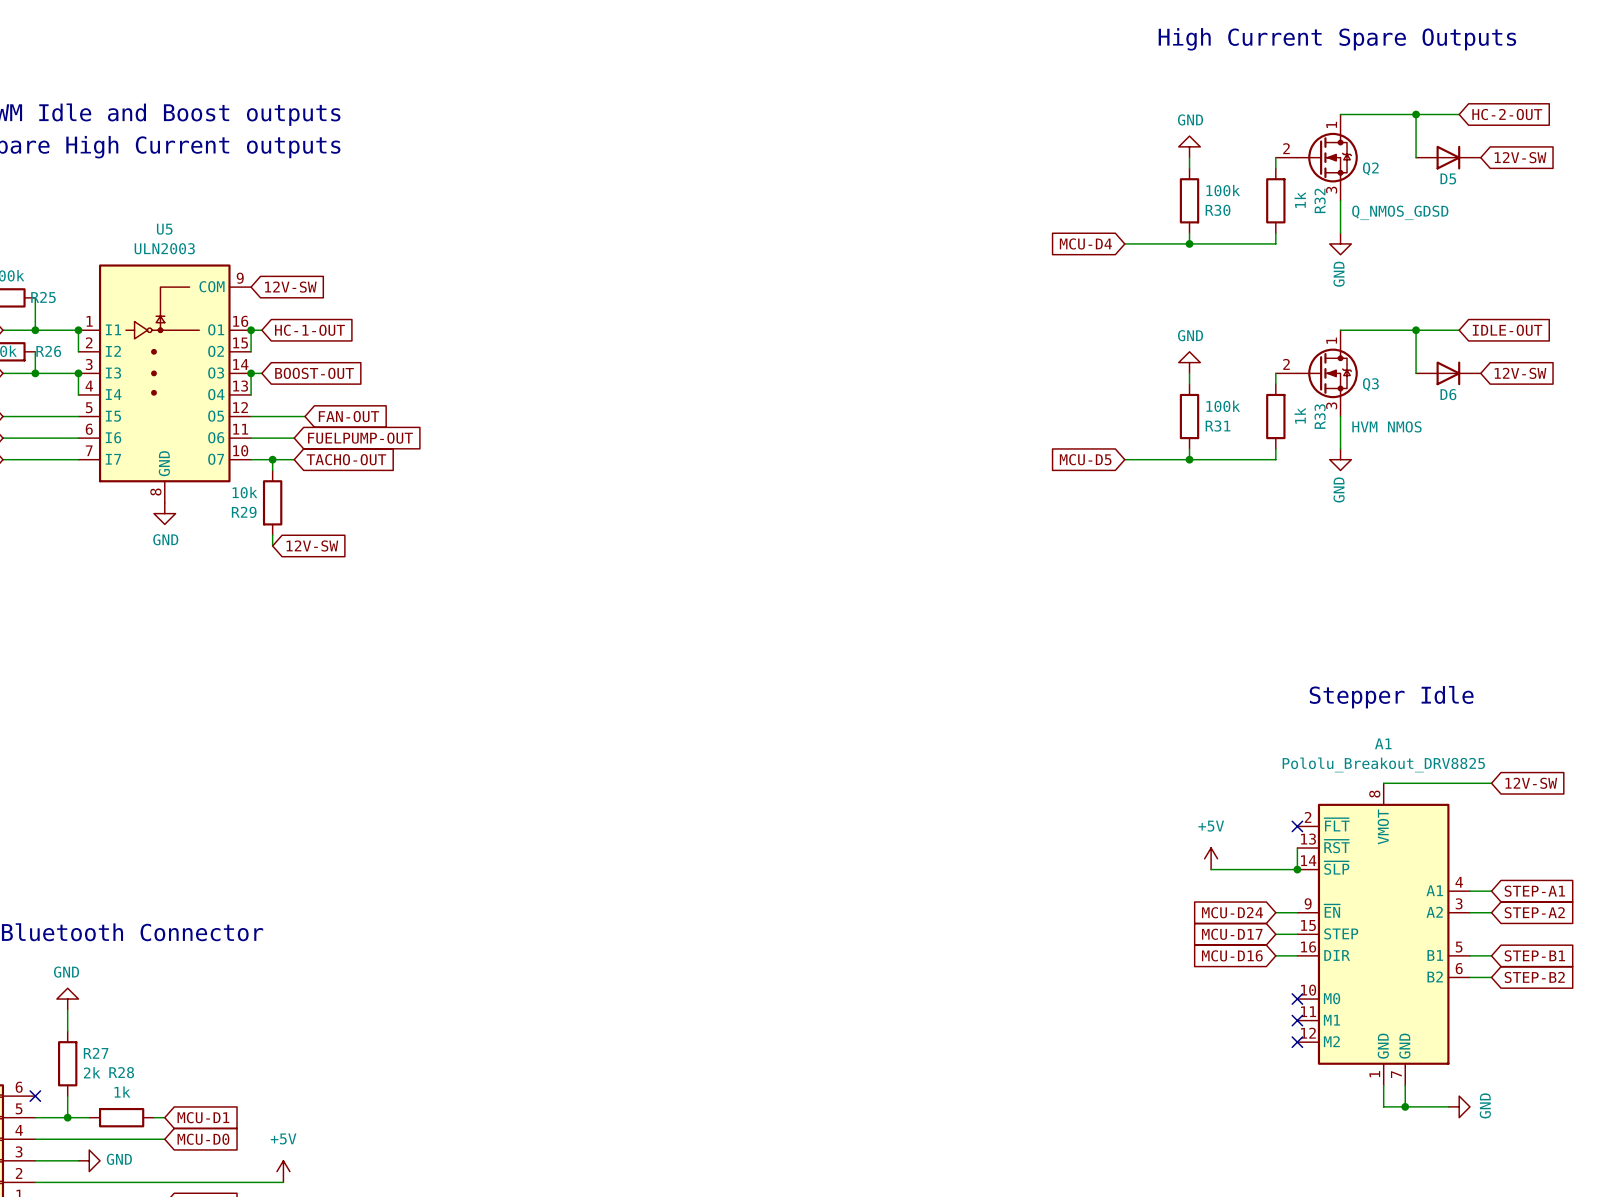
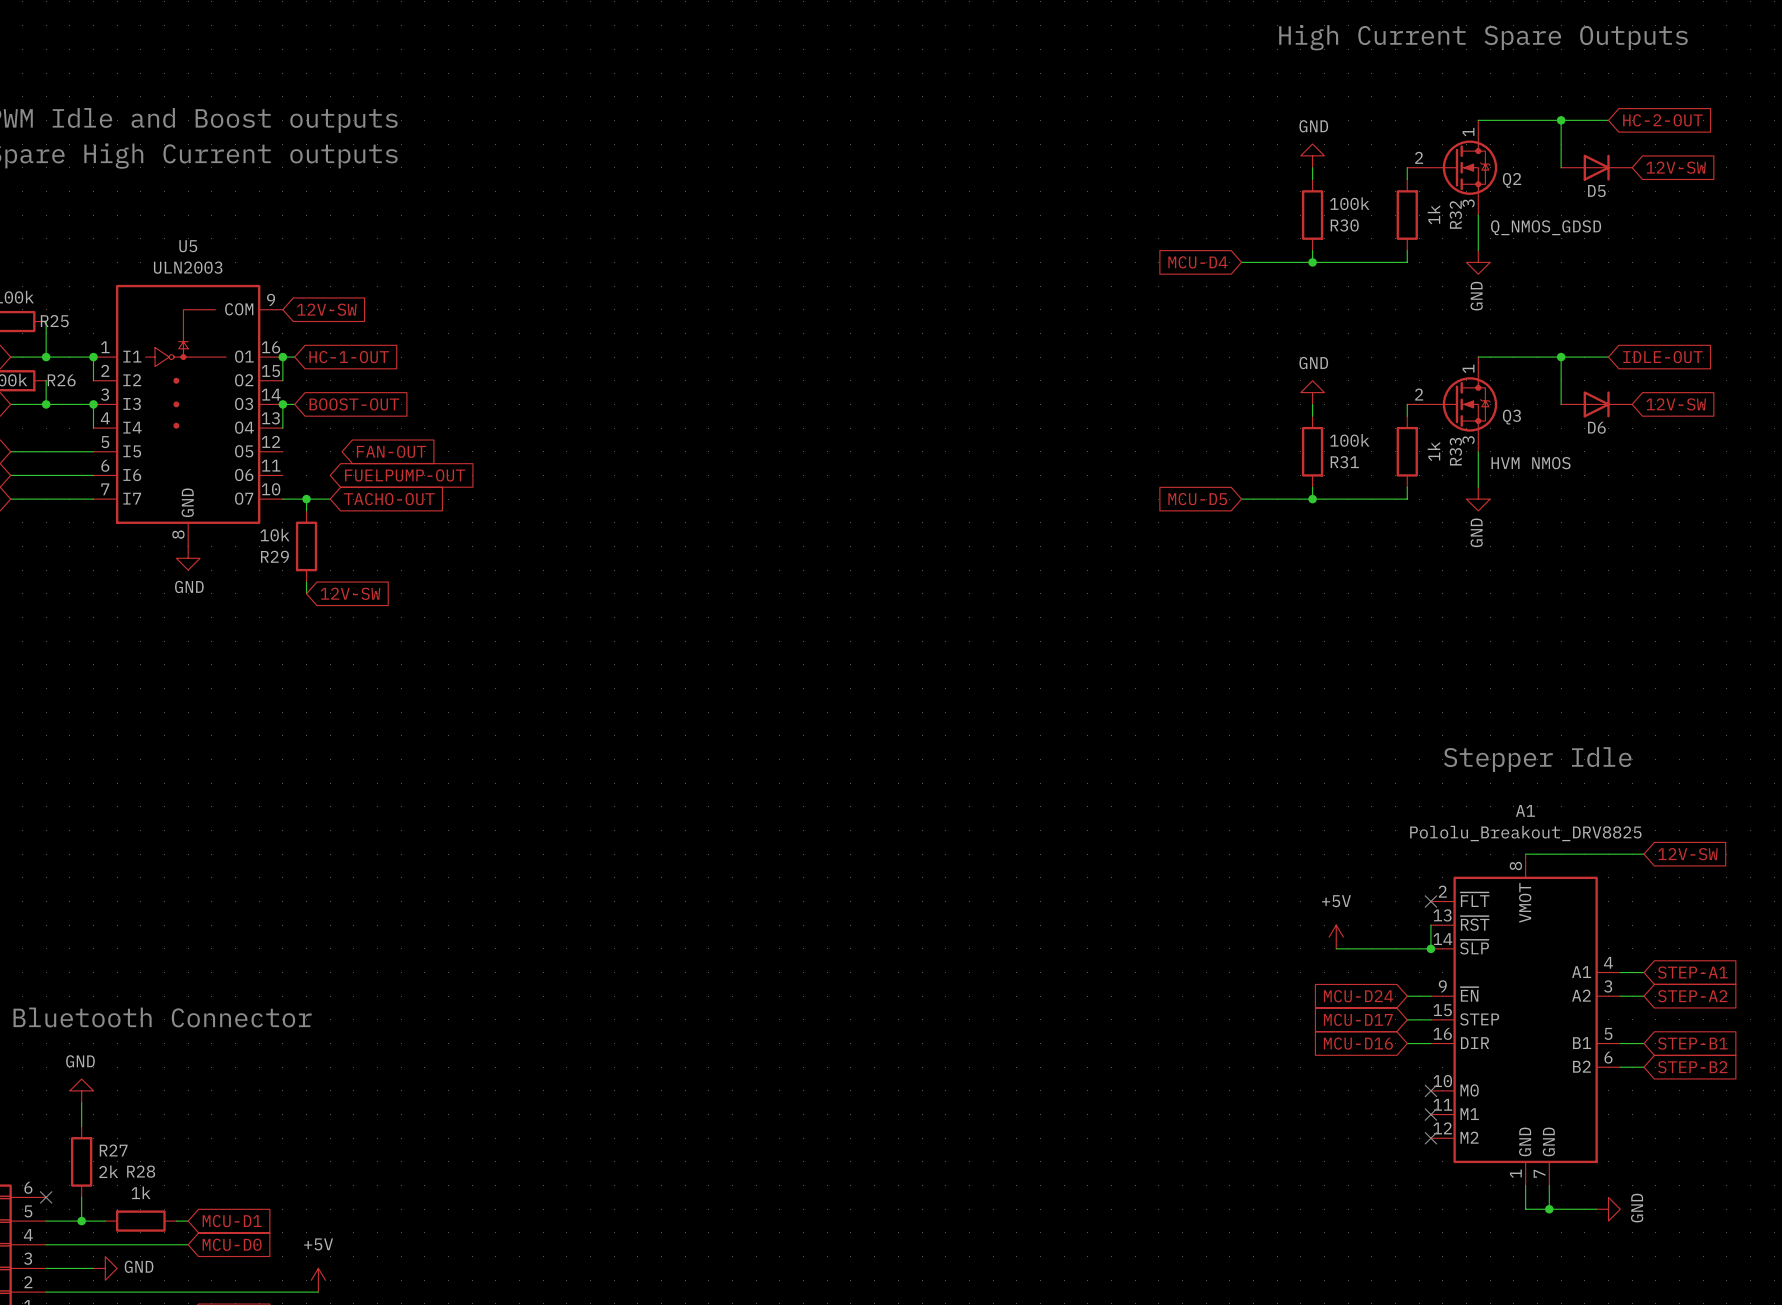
wire: (251, 416) (305, 416) -> none
wire: (251, 438) (294, 438) -> none

